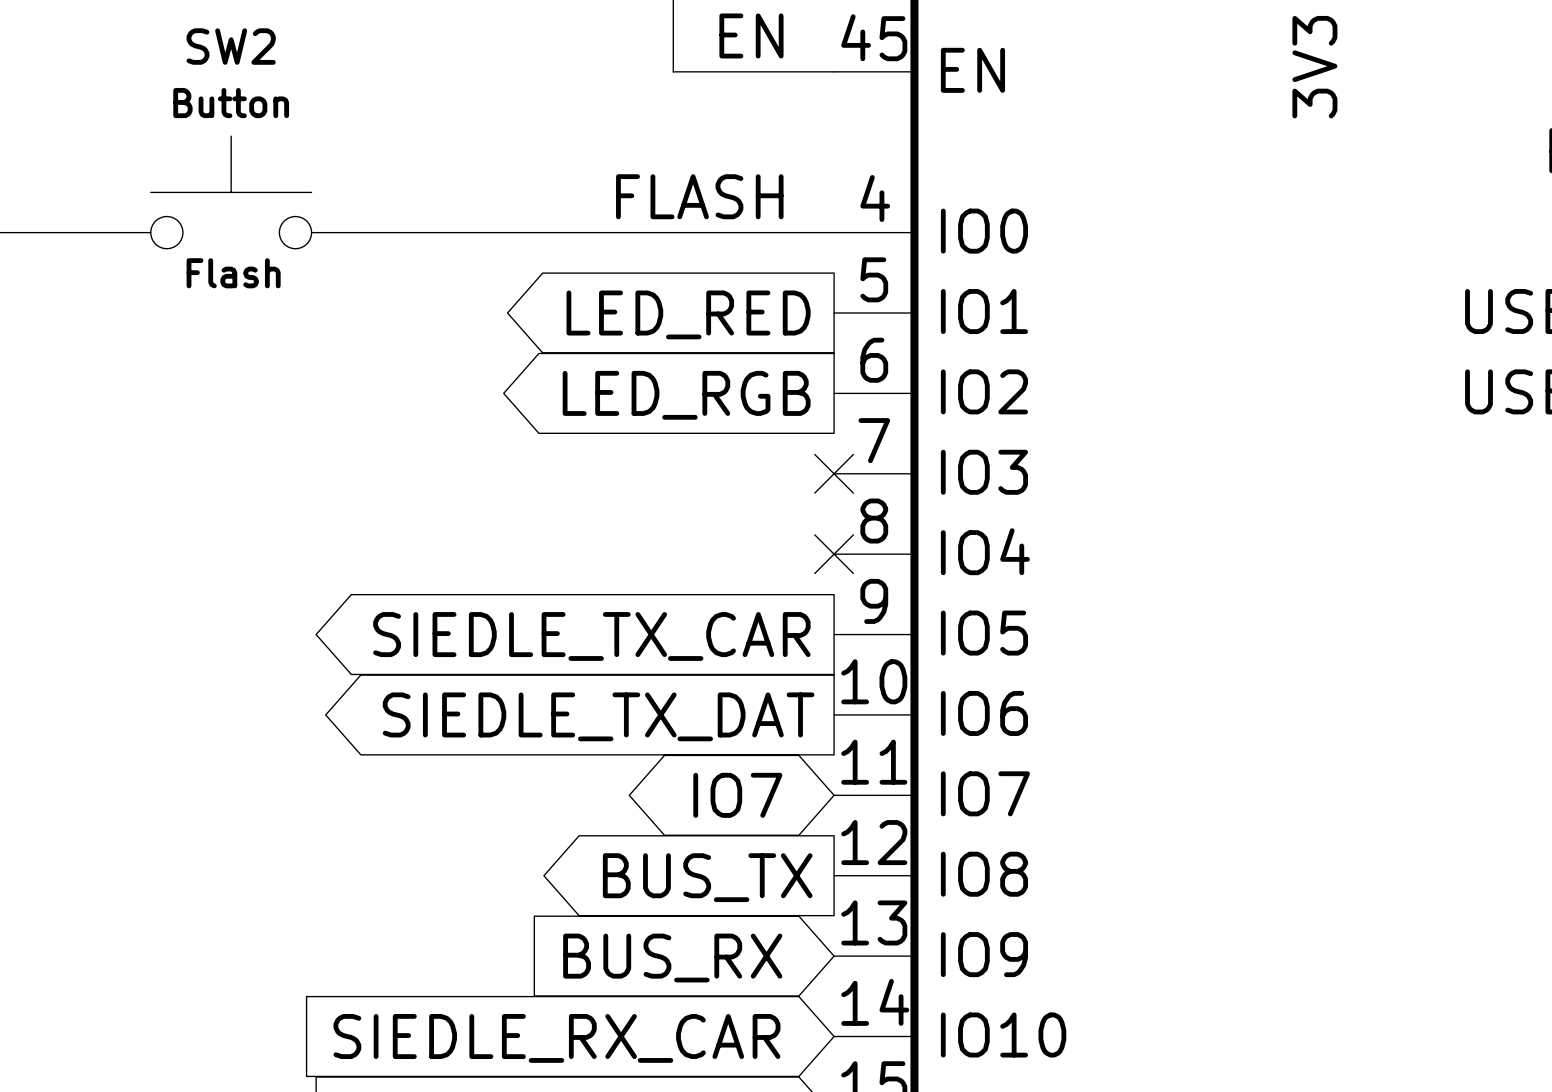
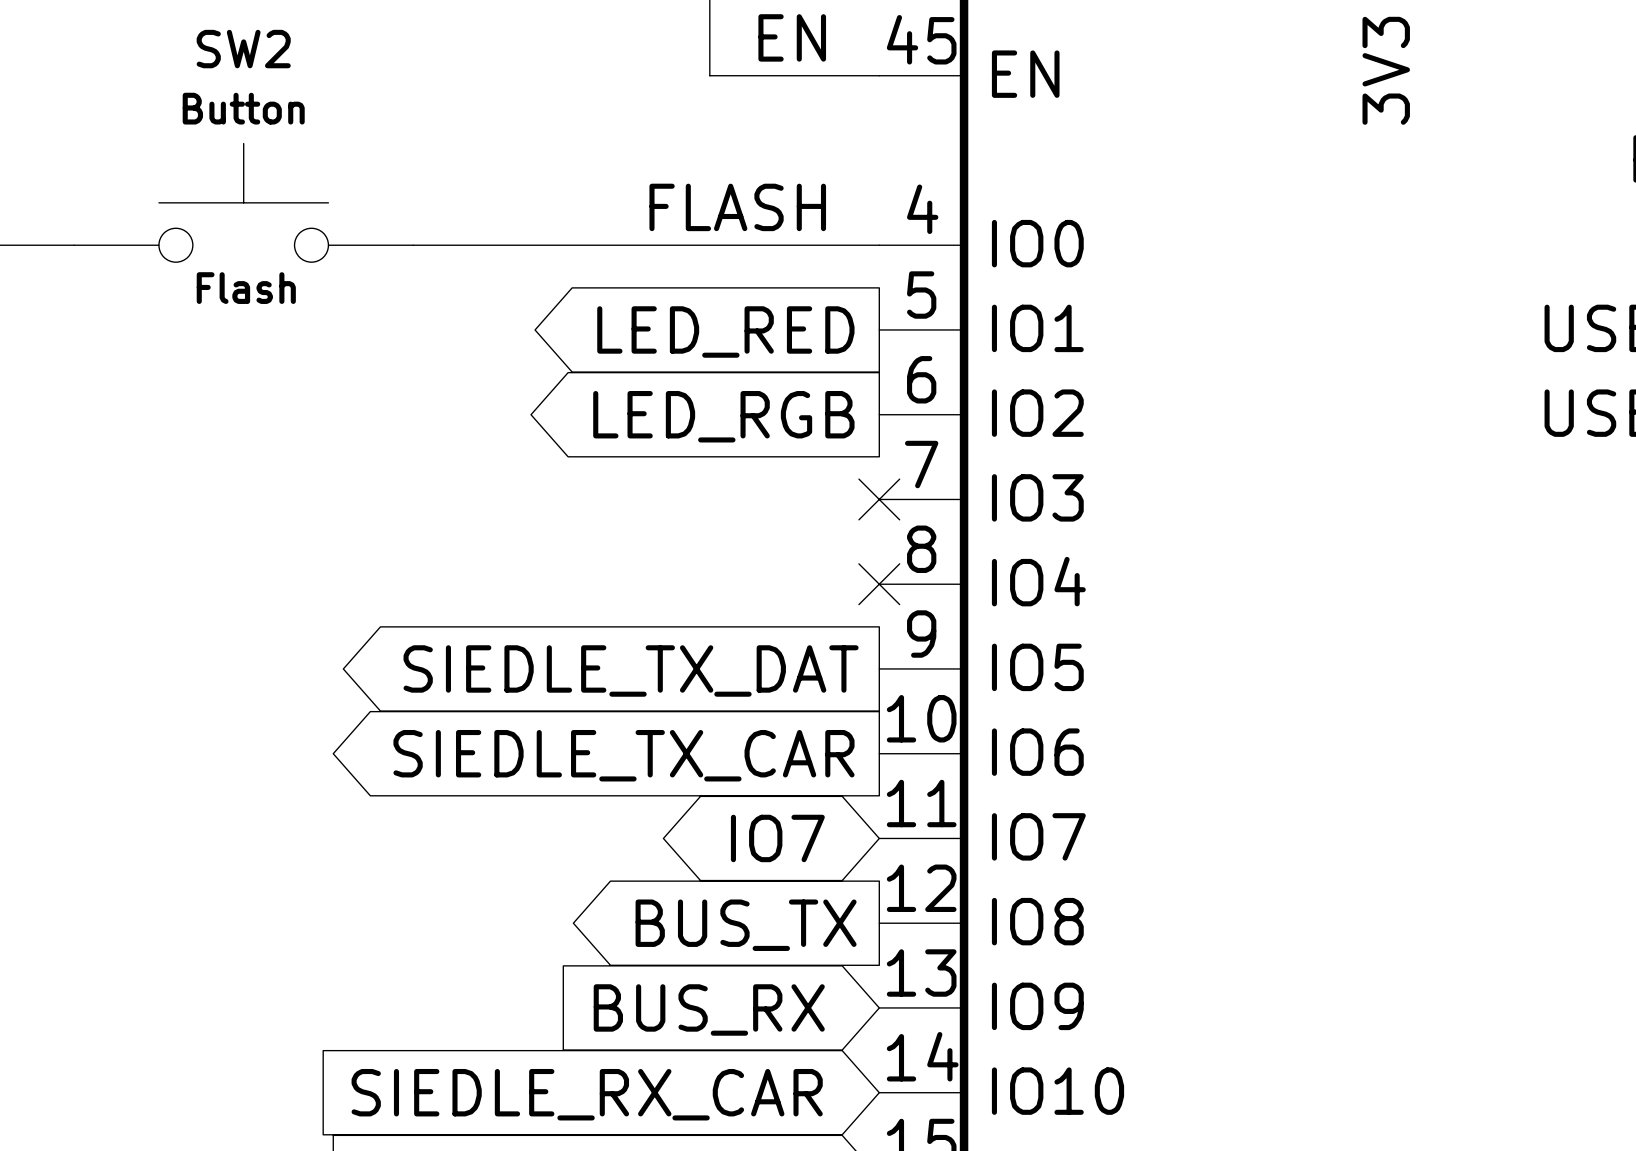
global label: SIEDLE_TX_CAR (591, 636) -> SIEDLE_TX_DAT (631, 670)
global label: SIEDLE_TX_DAT (598, 716) -> SIEDLE_TX_CAR (623, 755)

